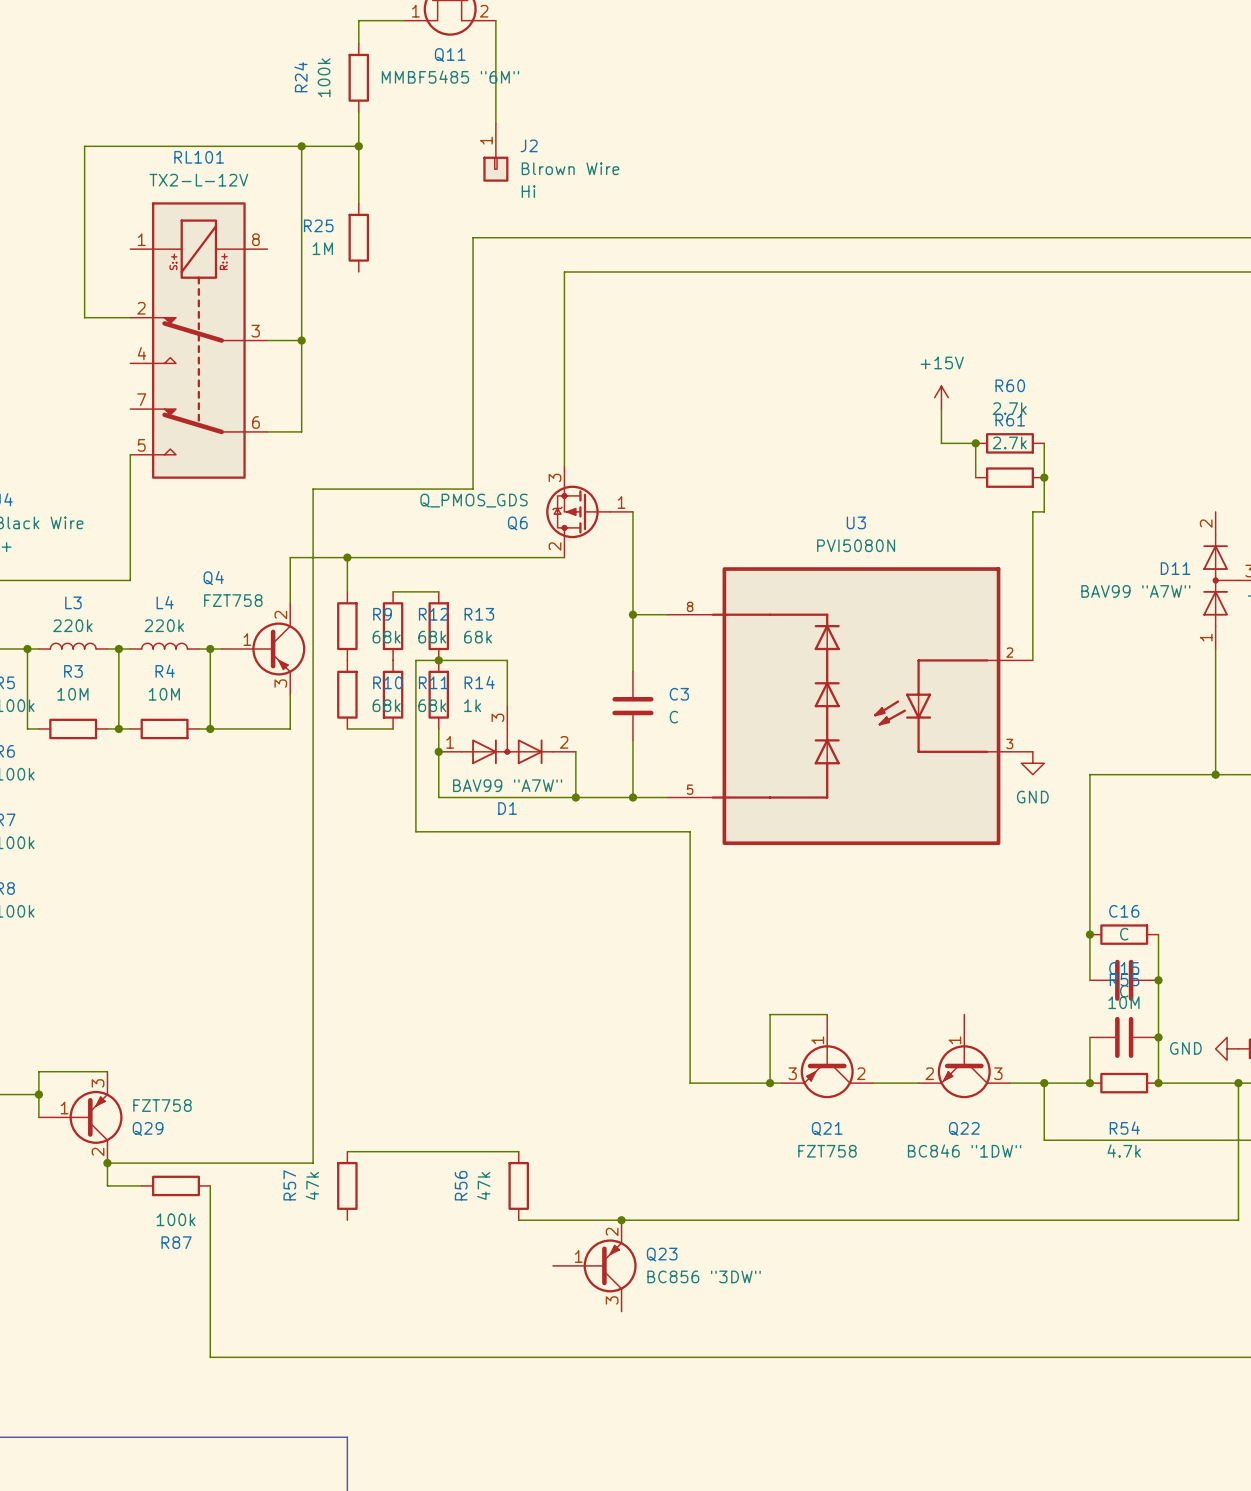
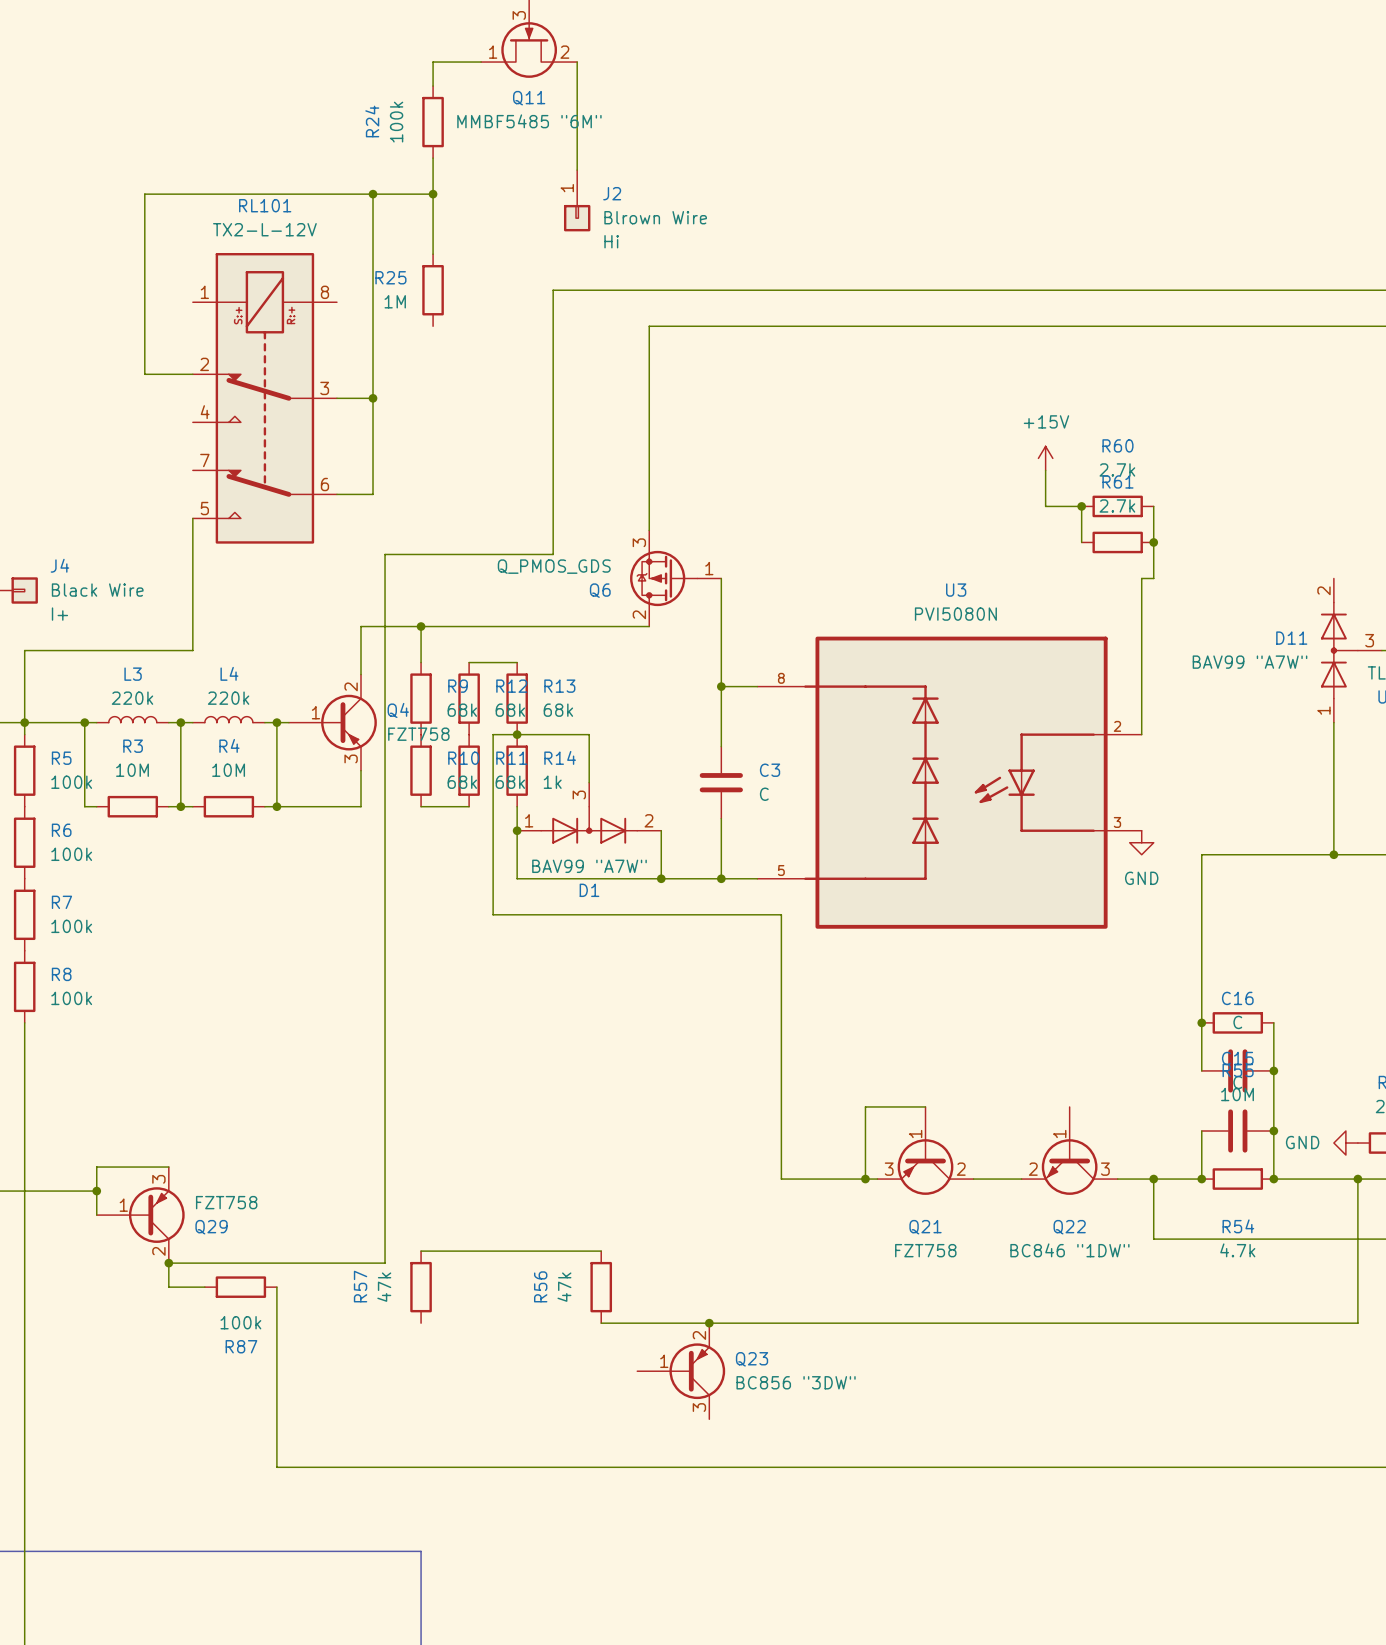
Q4 name position: Q4 (213, 578) -> Q4 (398, 710)
Q4 value position: FZT758 (233, 600) -> FZT758 (418, 734)

